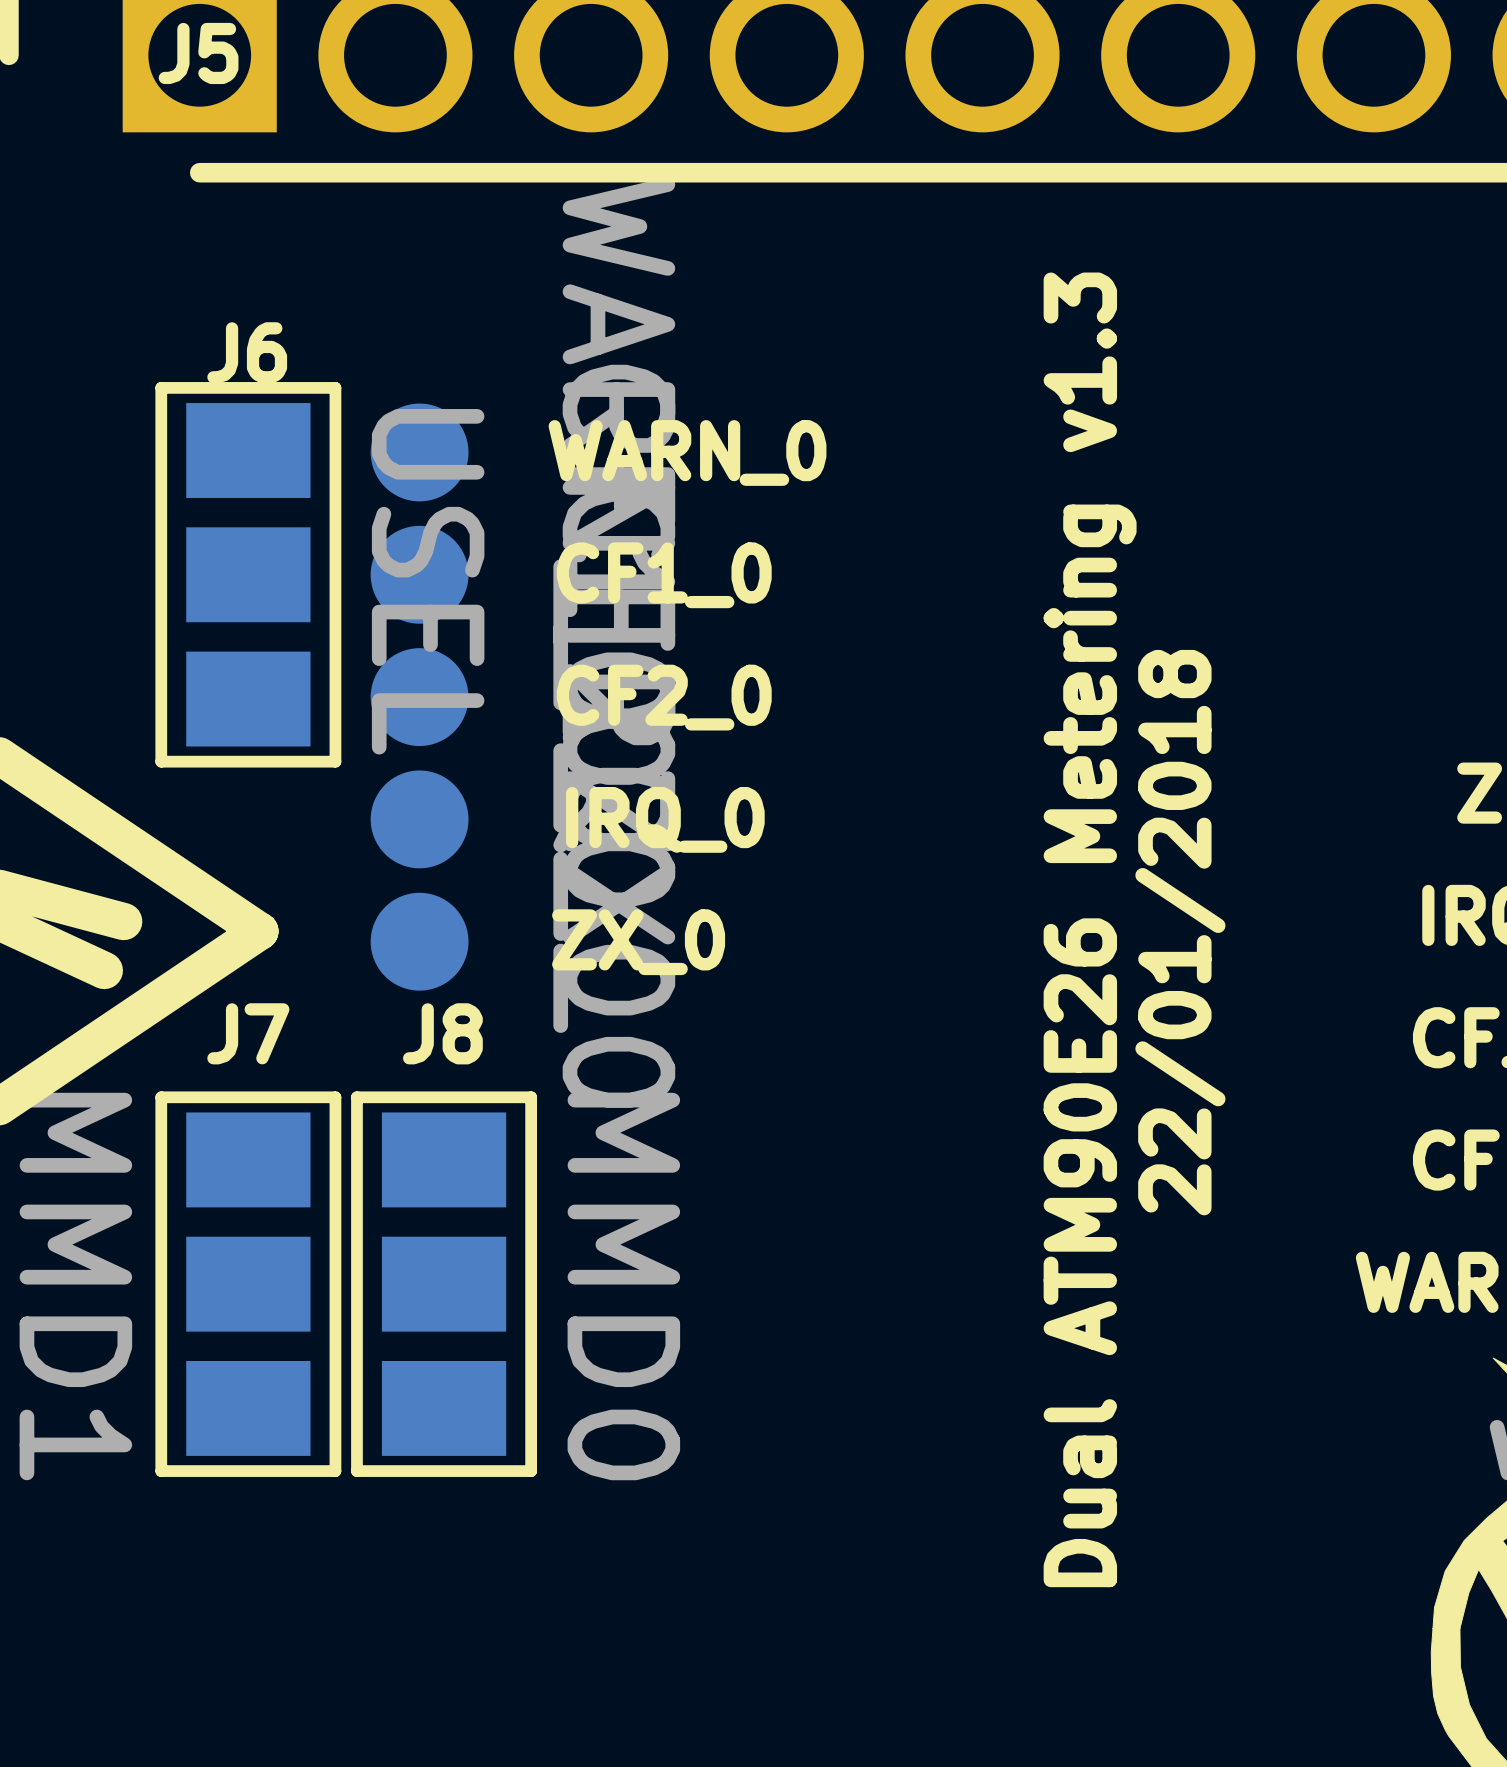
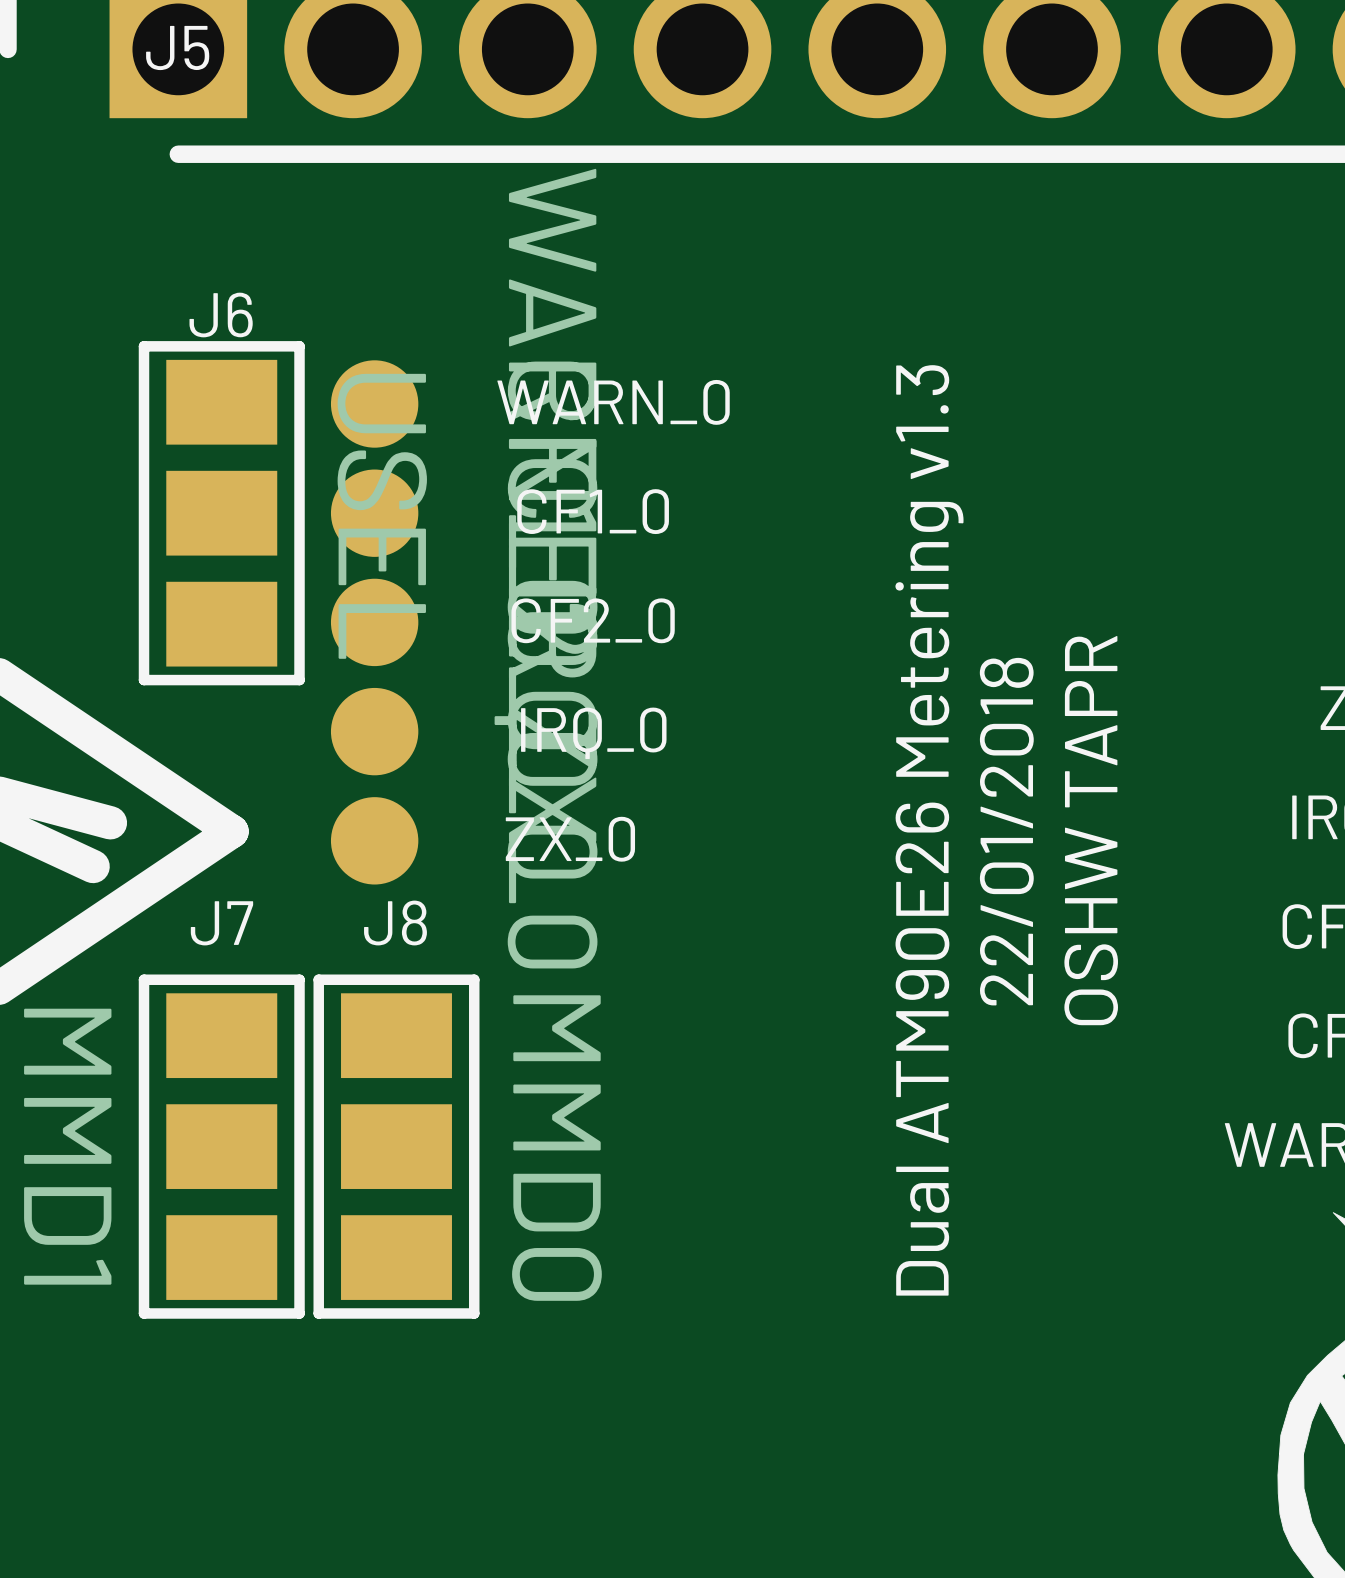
text position: Dual ATM90E26 Metering v1.3 (1090, 929) -> Dual ATM90E26 Metering v1.3 (929, 830)
text: none -> OSHW TAPR (1091, 830)
text position: 22/01/2018 (1180, 932) -> 22/01/2018 (1006, 831)

